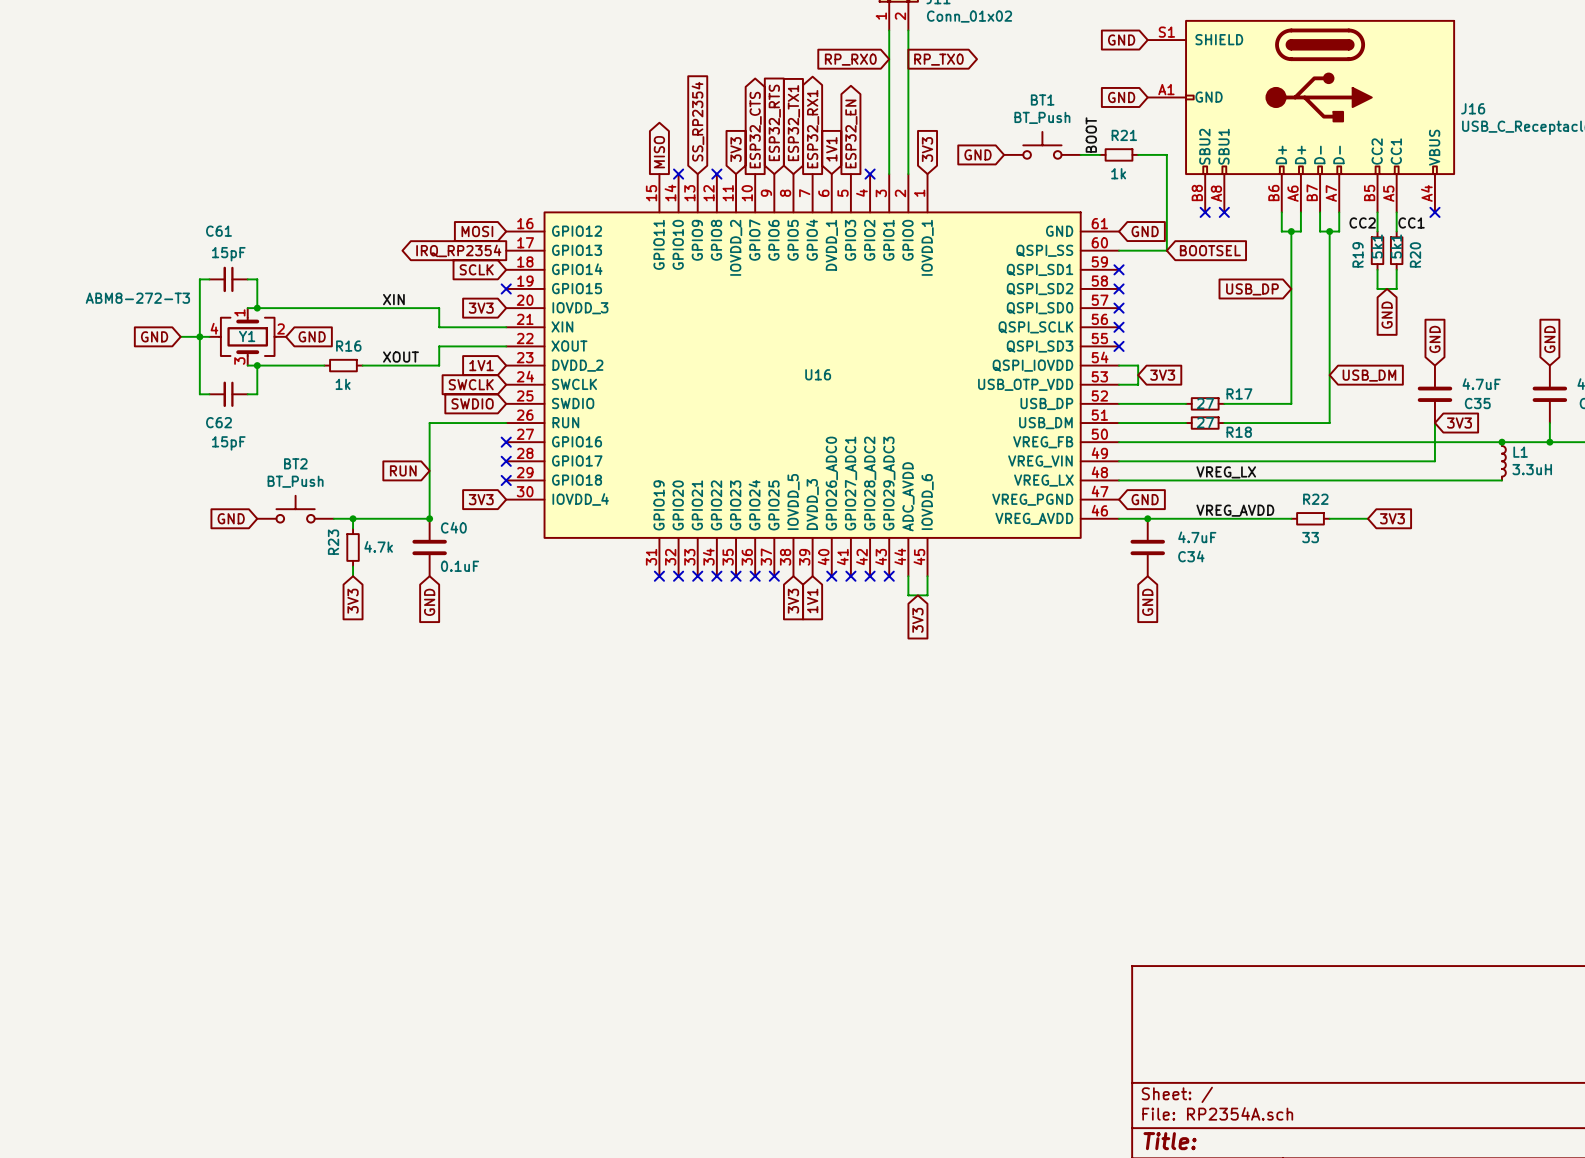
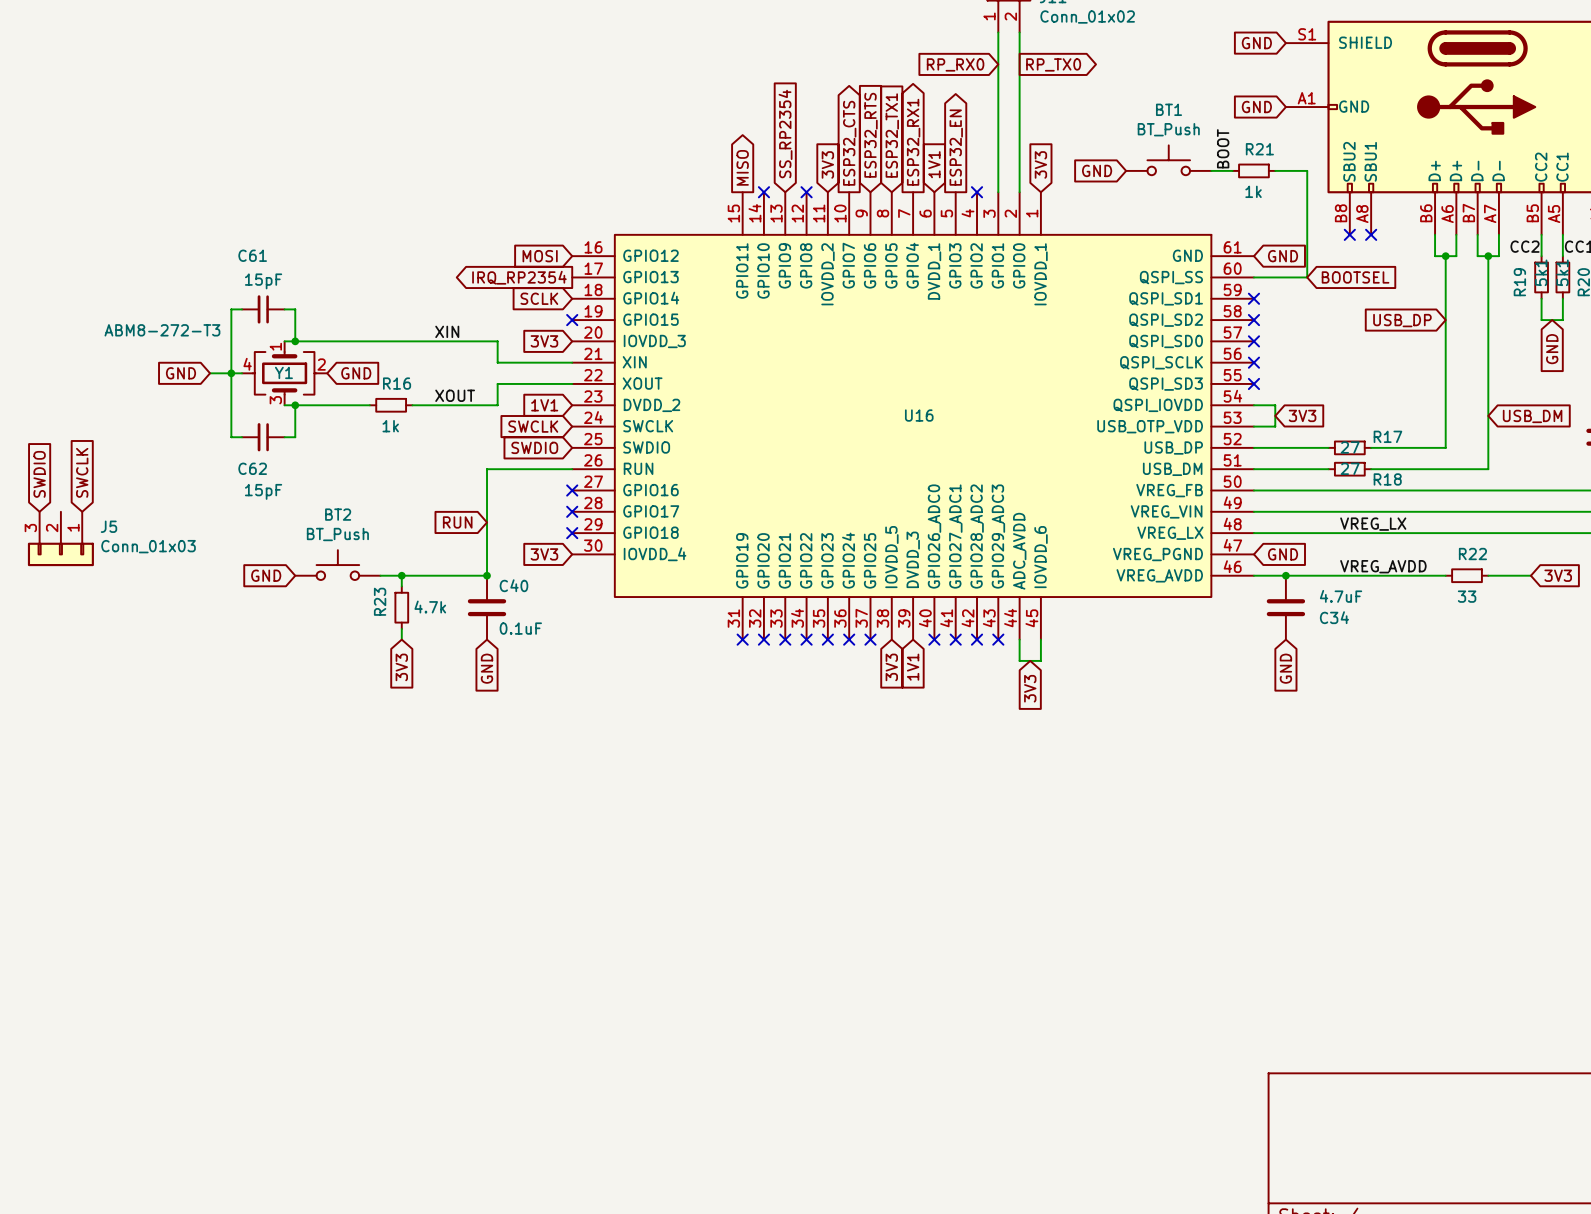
global label: none -> SWCLK (82, 472)
global label: none -> SWDIO (39, 474)
J5: none -> Conn_01x03 (60, 538)

